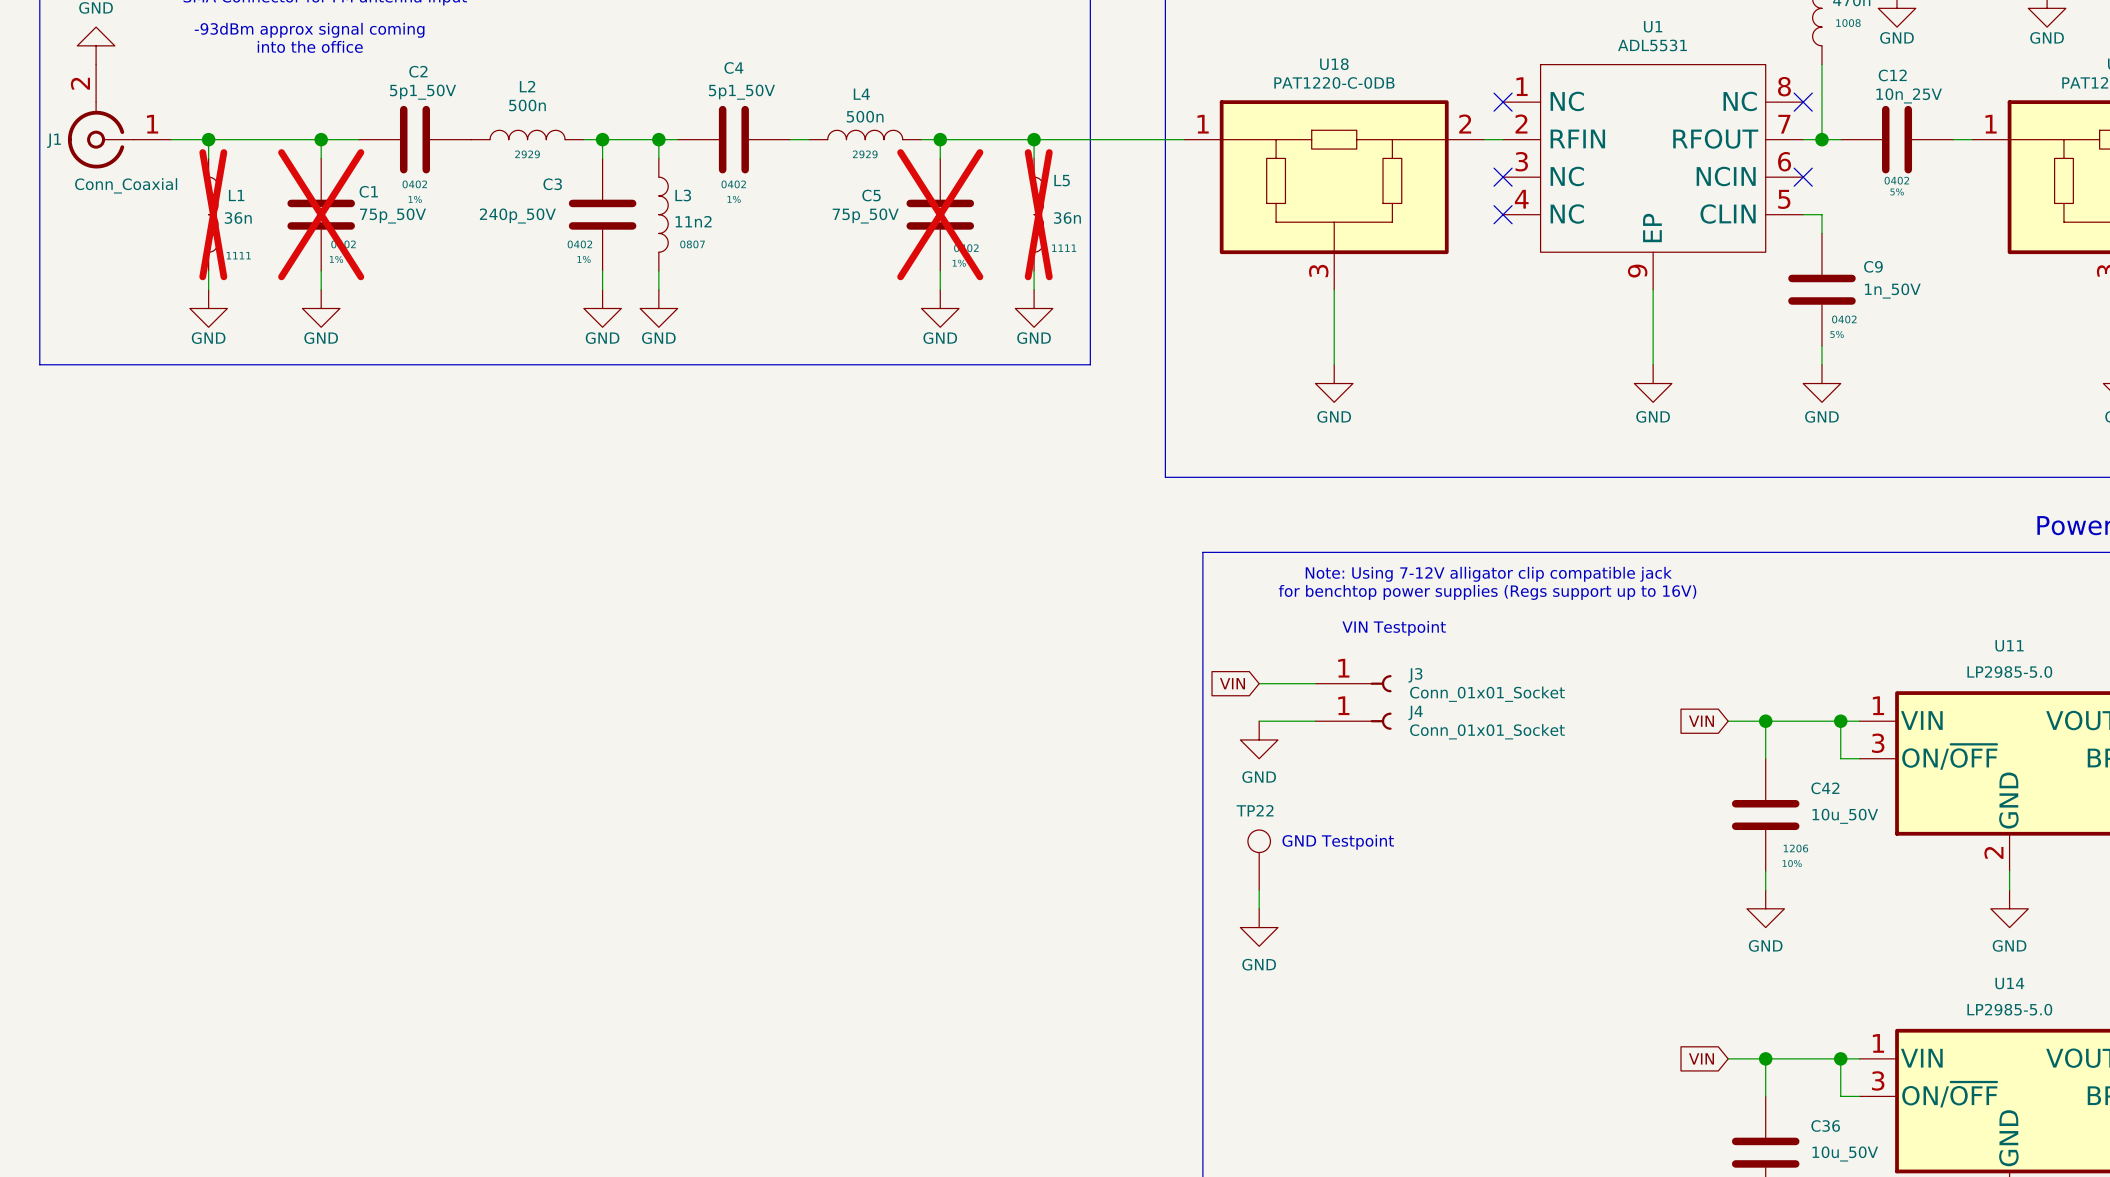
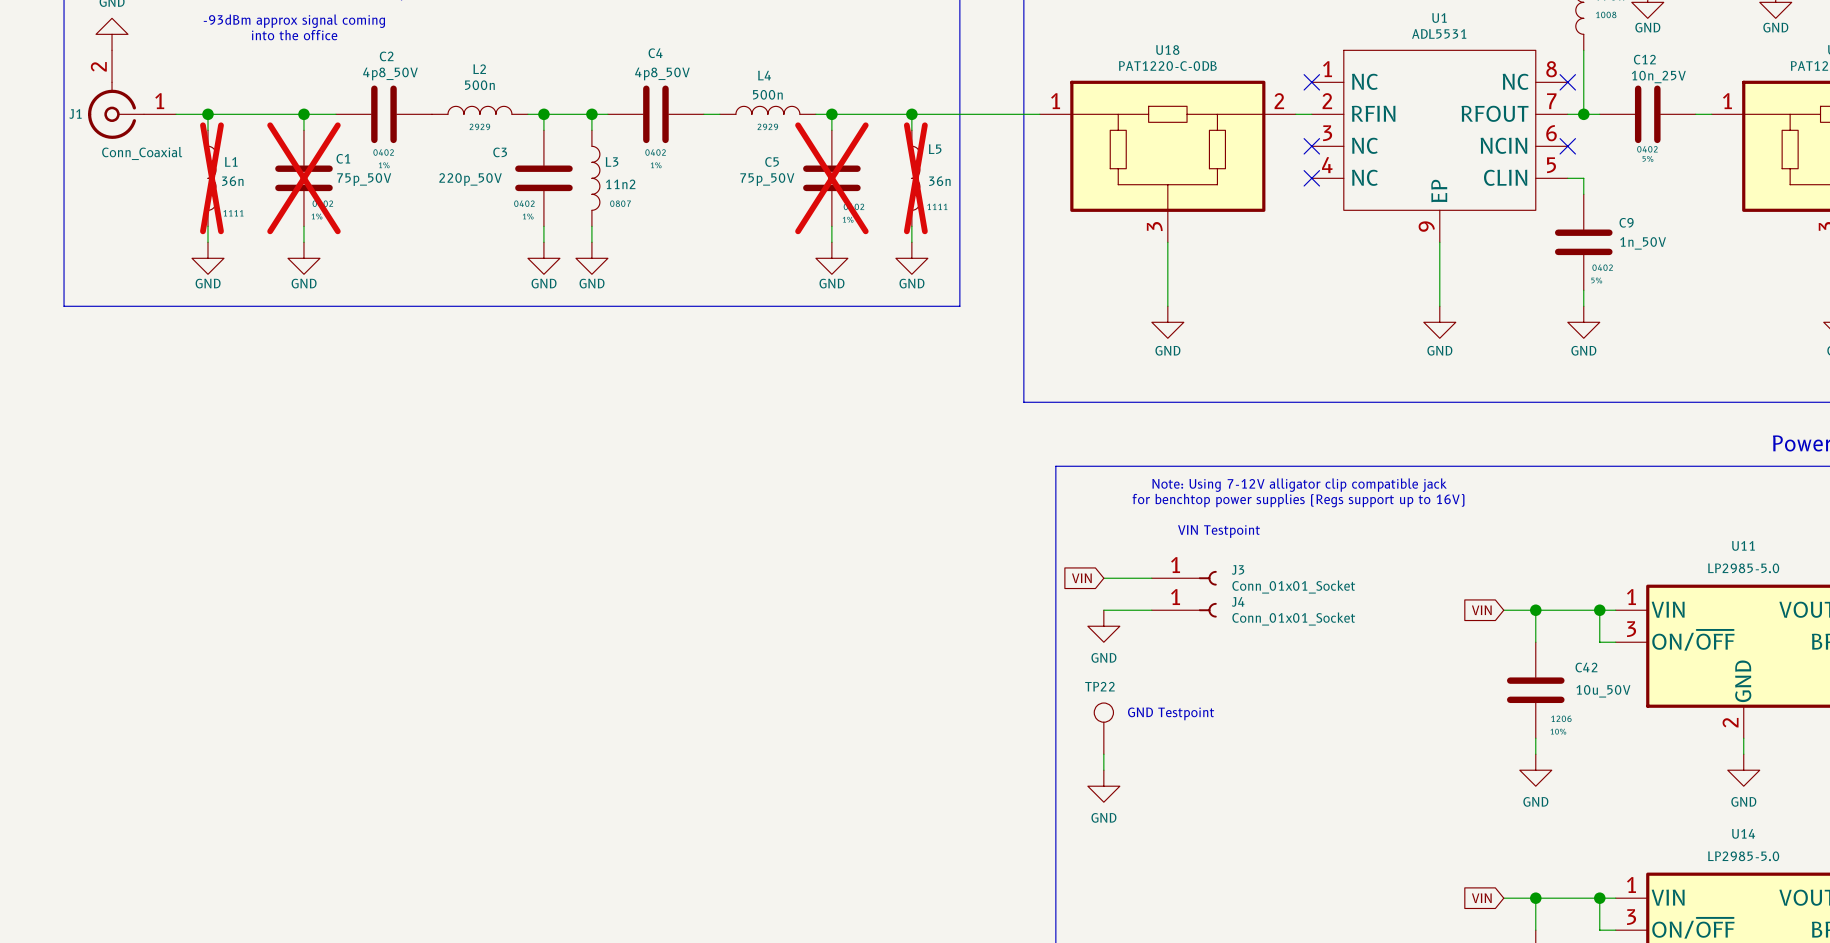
C2 value: 5p1_50V (423, 92) -> 4p8_50V (390, 73)
C4 value: 5p1_50V (741, 92) -> 4p8_50V (662, 73)
C3 value: 240p_50V (517, 215) -> 220p_50V (470, 179)

